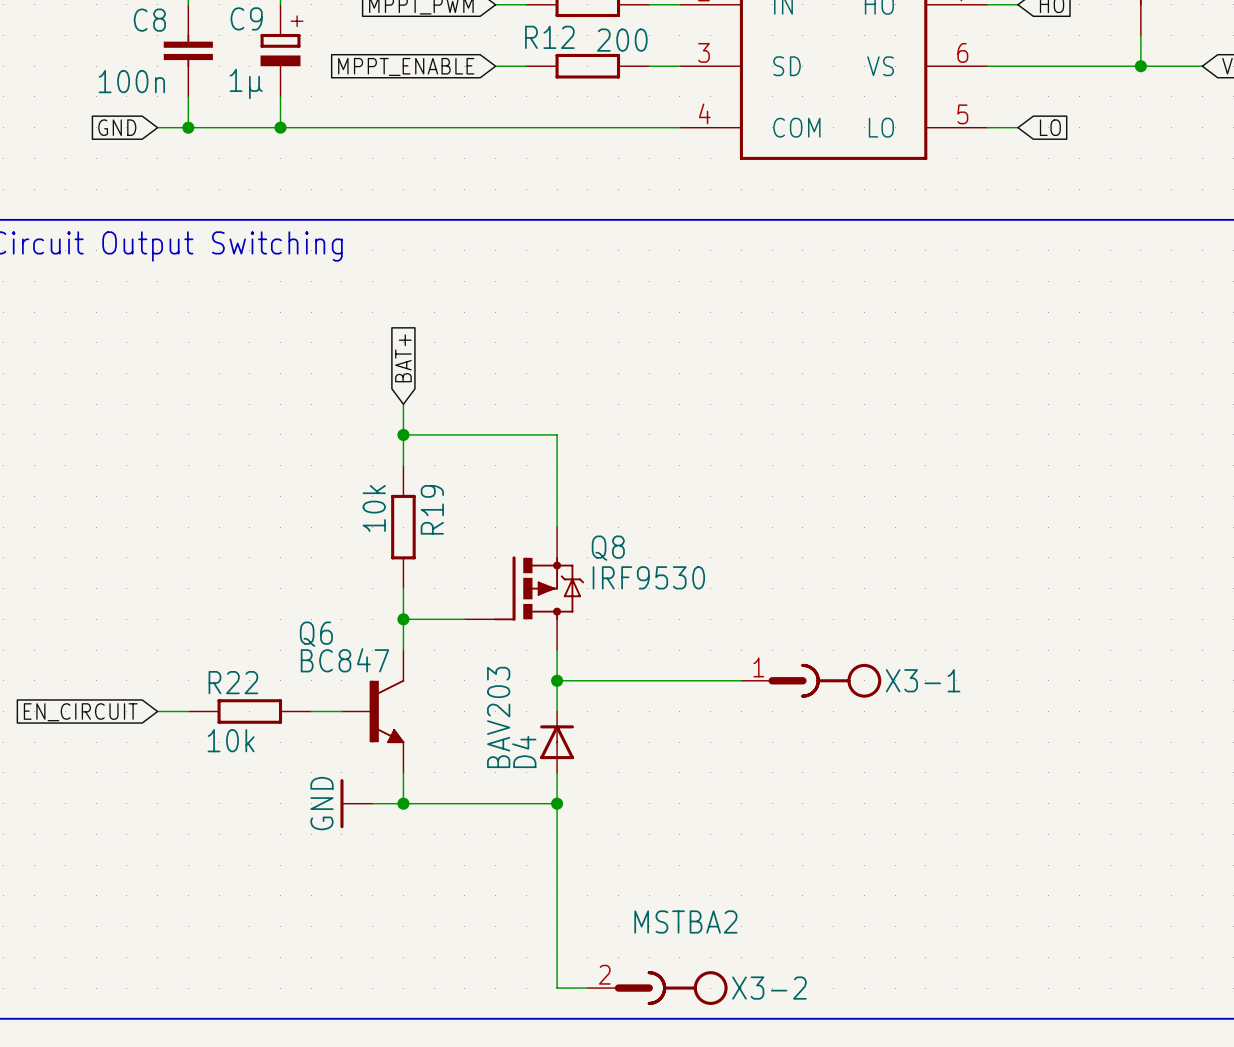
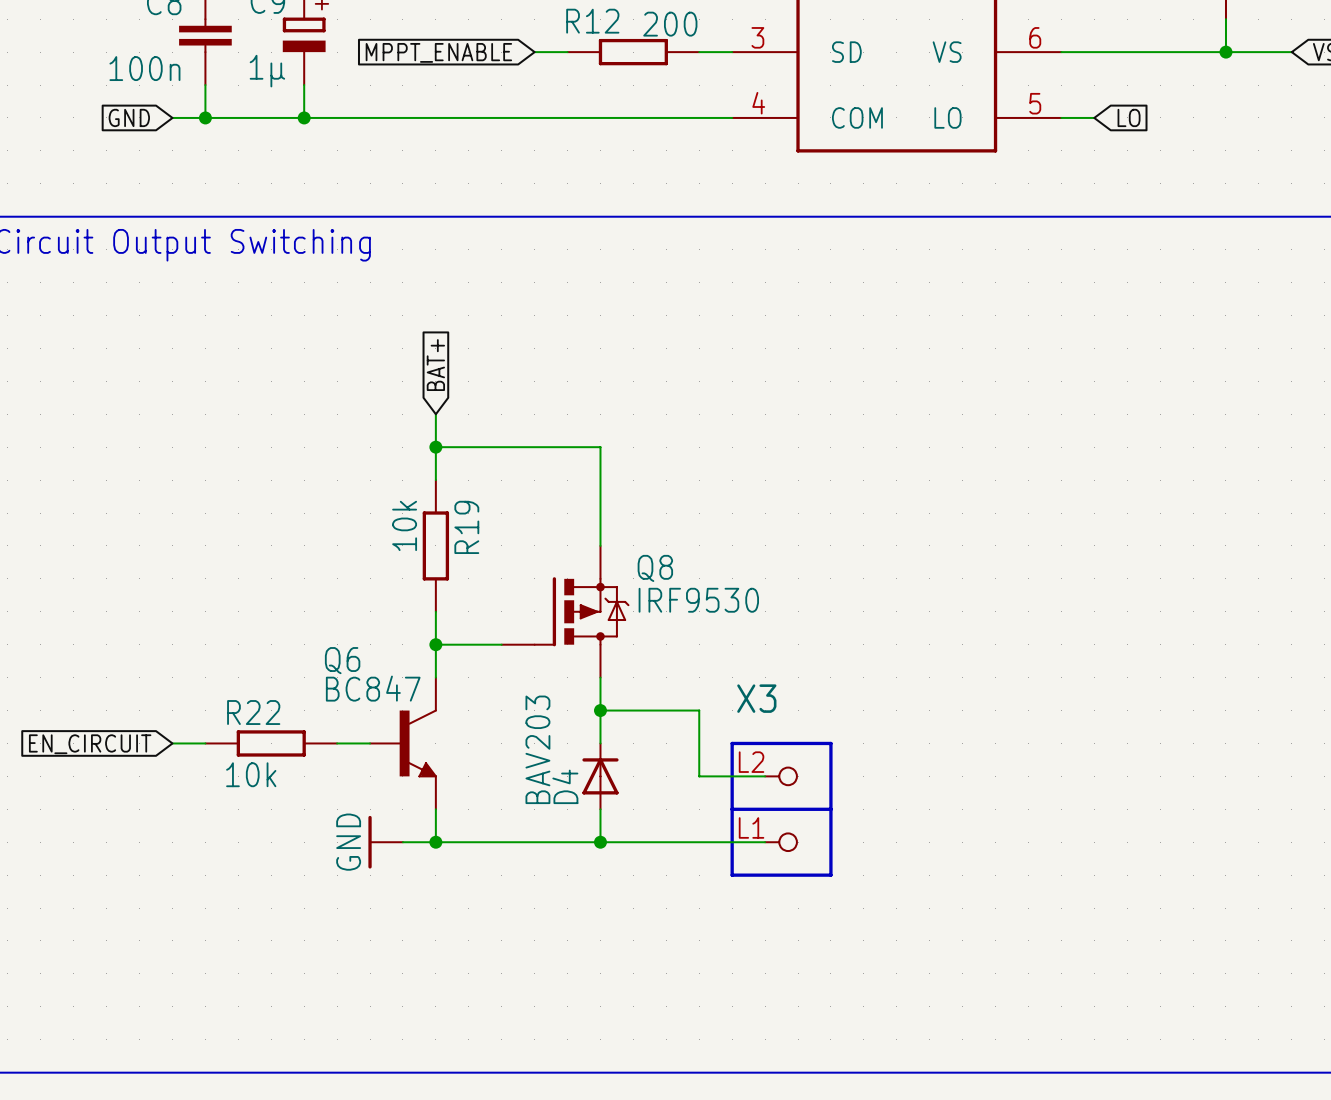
wire: (649, 680) (741, 680) -> (699, 710) (699, 776) (765, 776)
X3-1: (811, 680) -> none
X3: none -> (781, 809)
wire: (557, 803) (557, 988) (587, 988) -> (600, 842) (765, 842)
X3-2: MSTBA2 (657, 988) -> none

